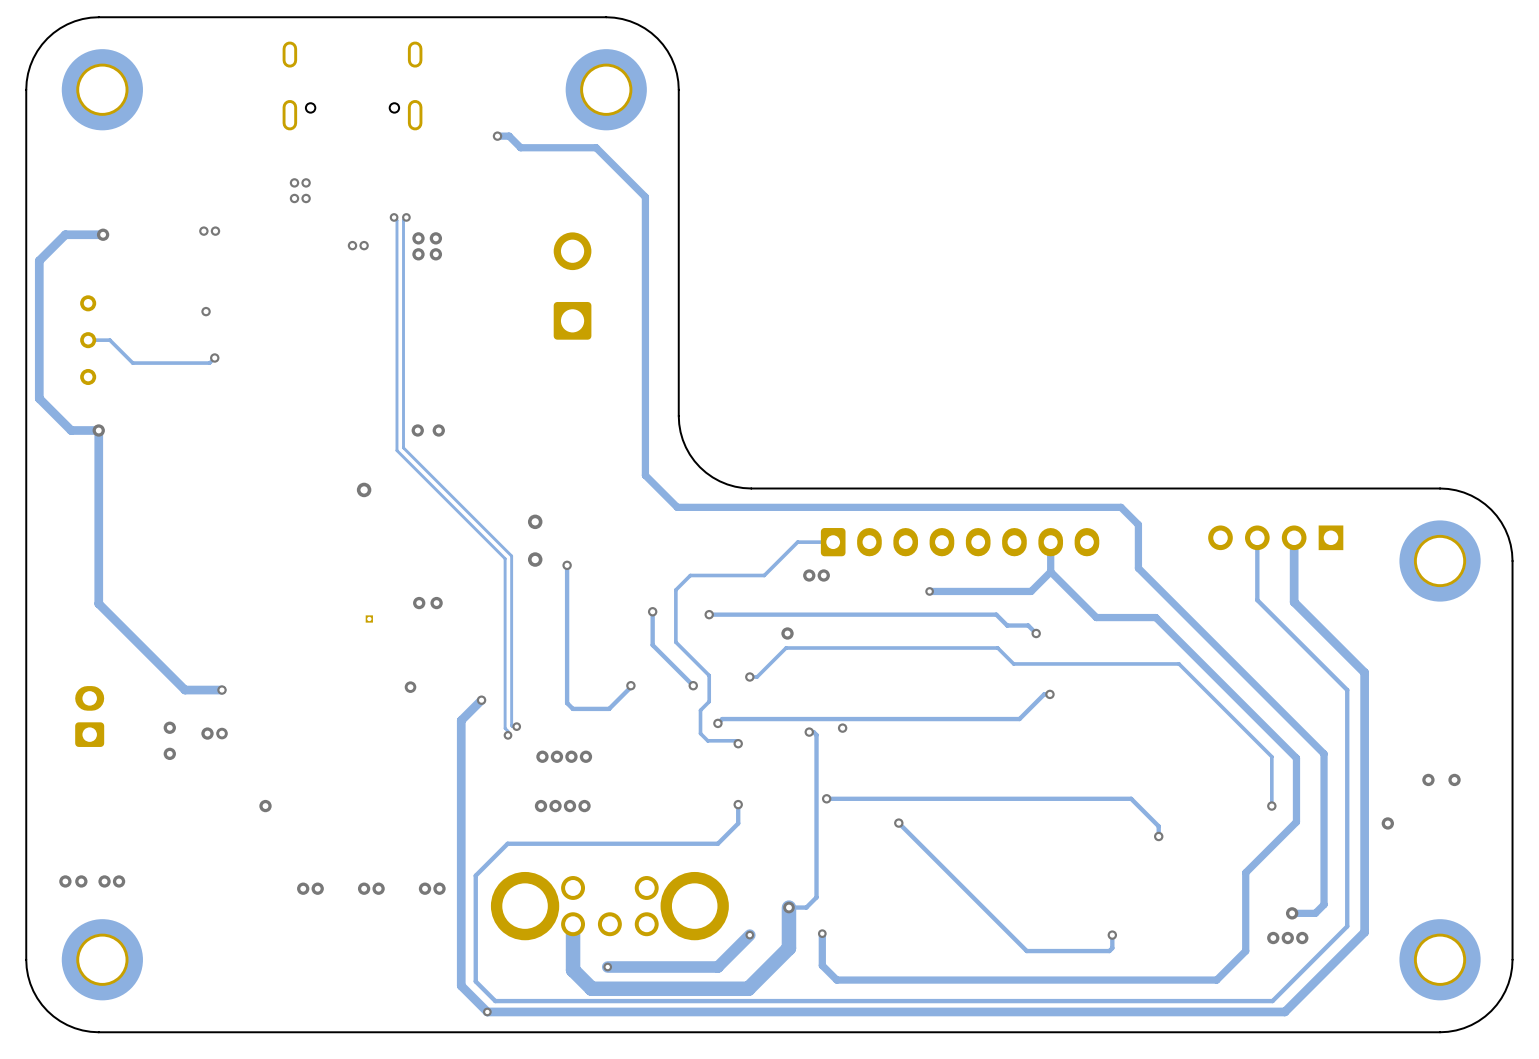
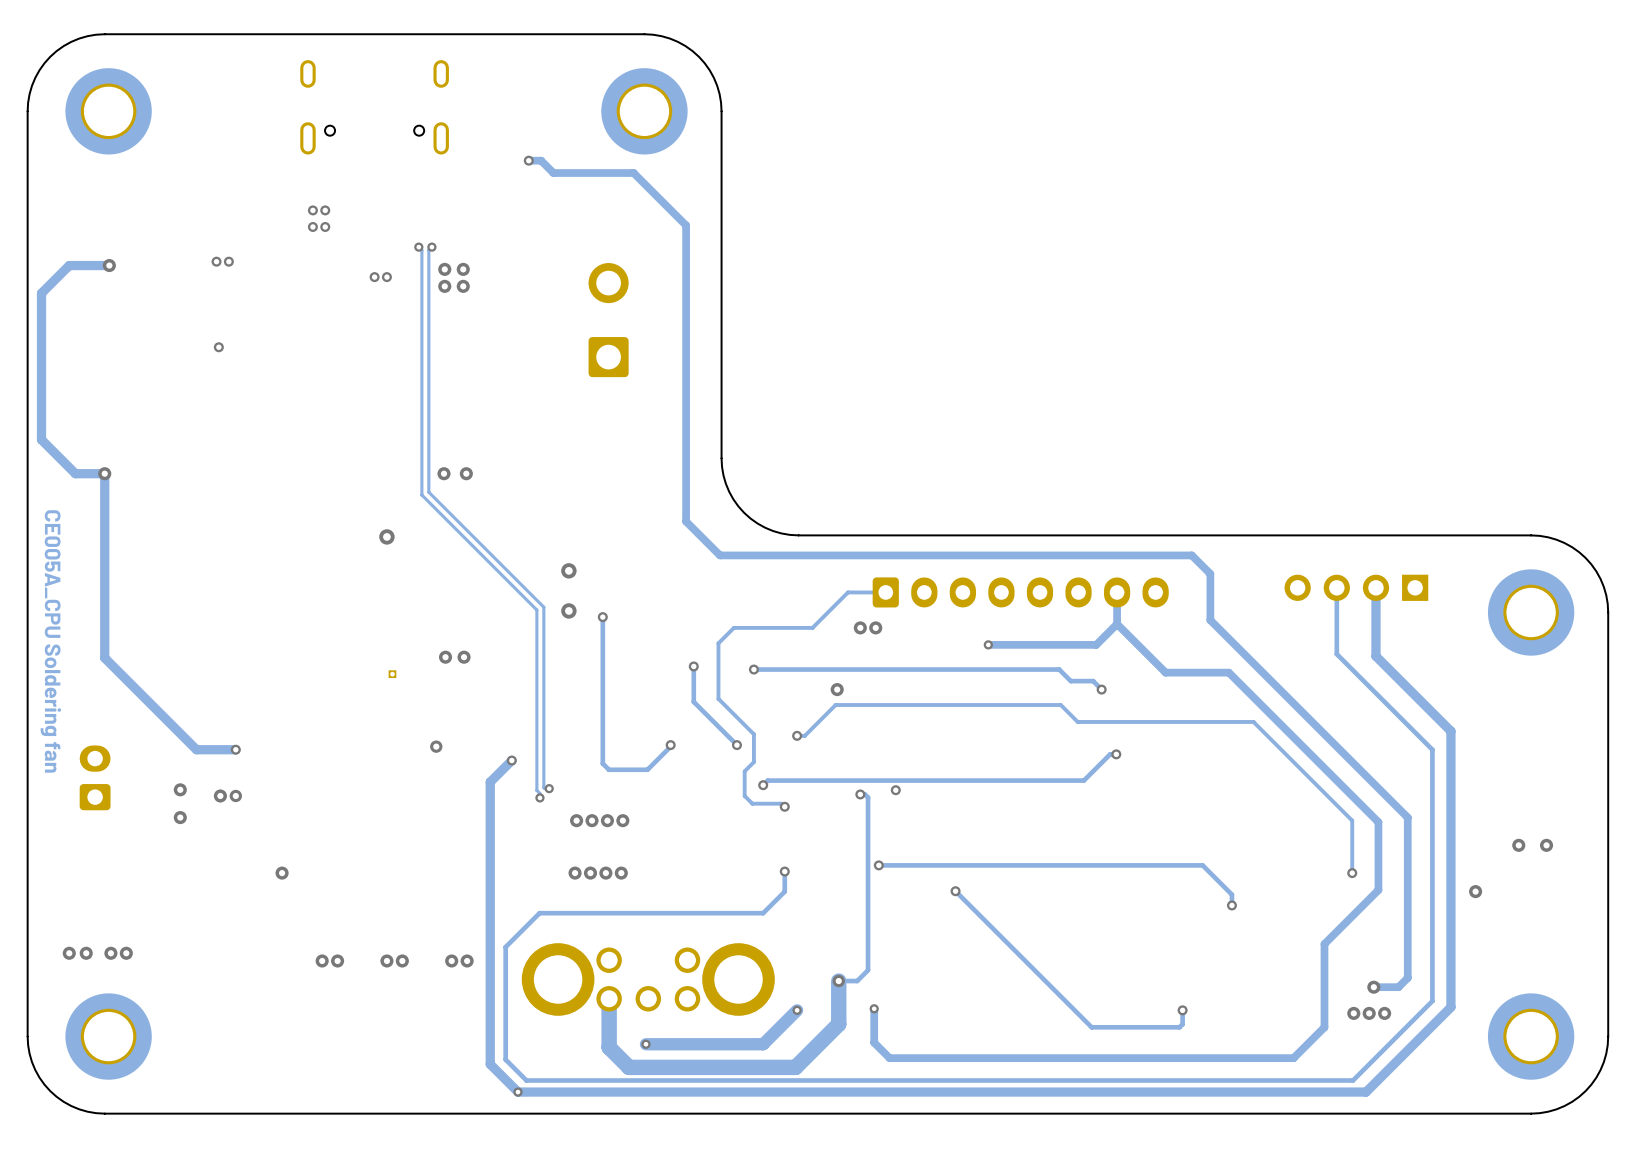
track: (88, 340) (109, 340) (132, 363) (209, 363) (214, 357) -> none
part: (88, 340) -> none
via: (214, 357) -> none
text: none -> CE005A_CPU Soldering fan (50, 641)

